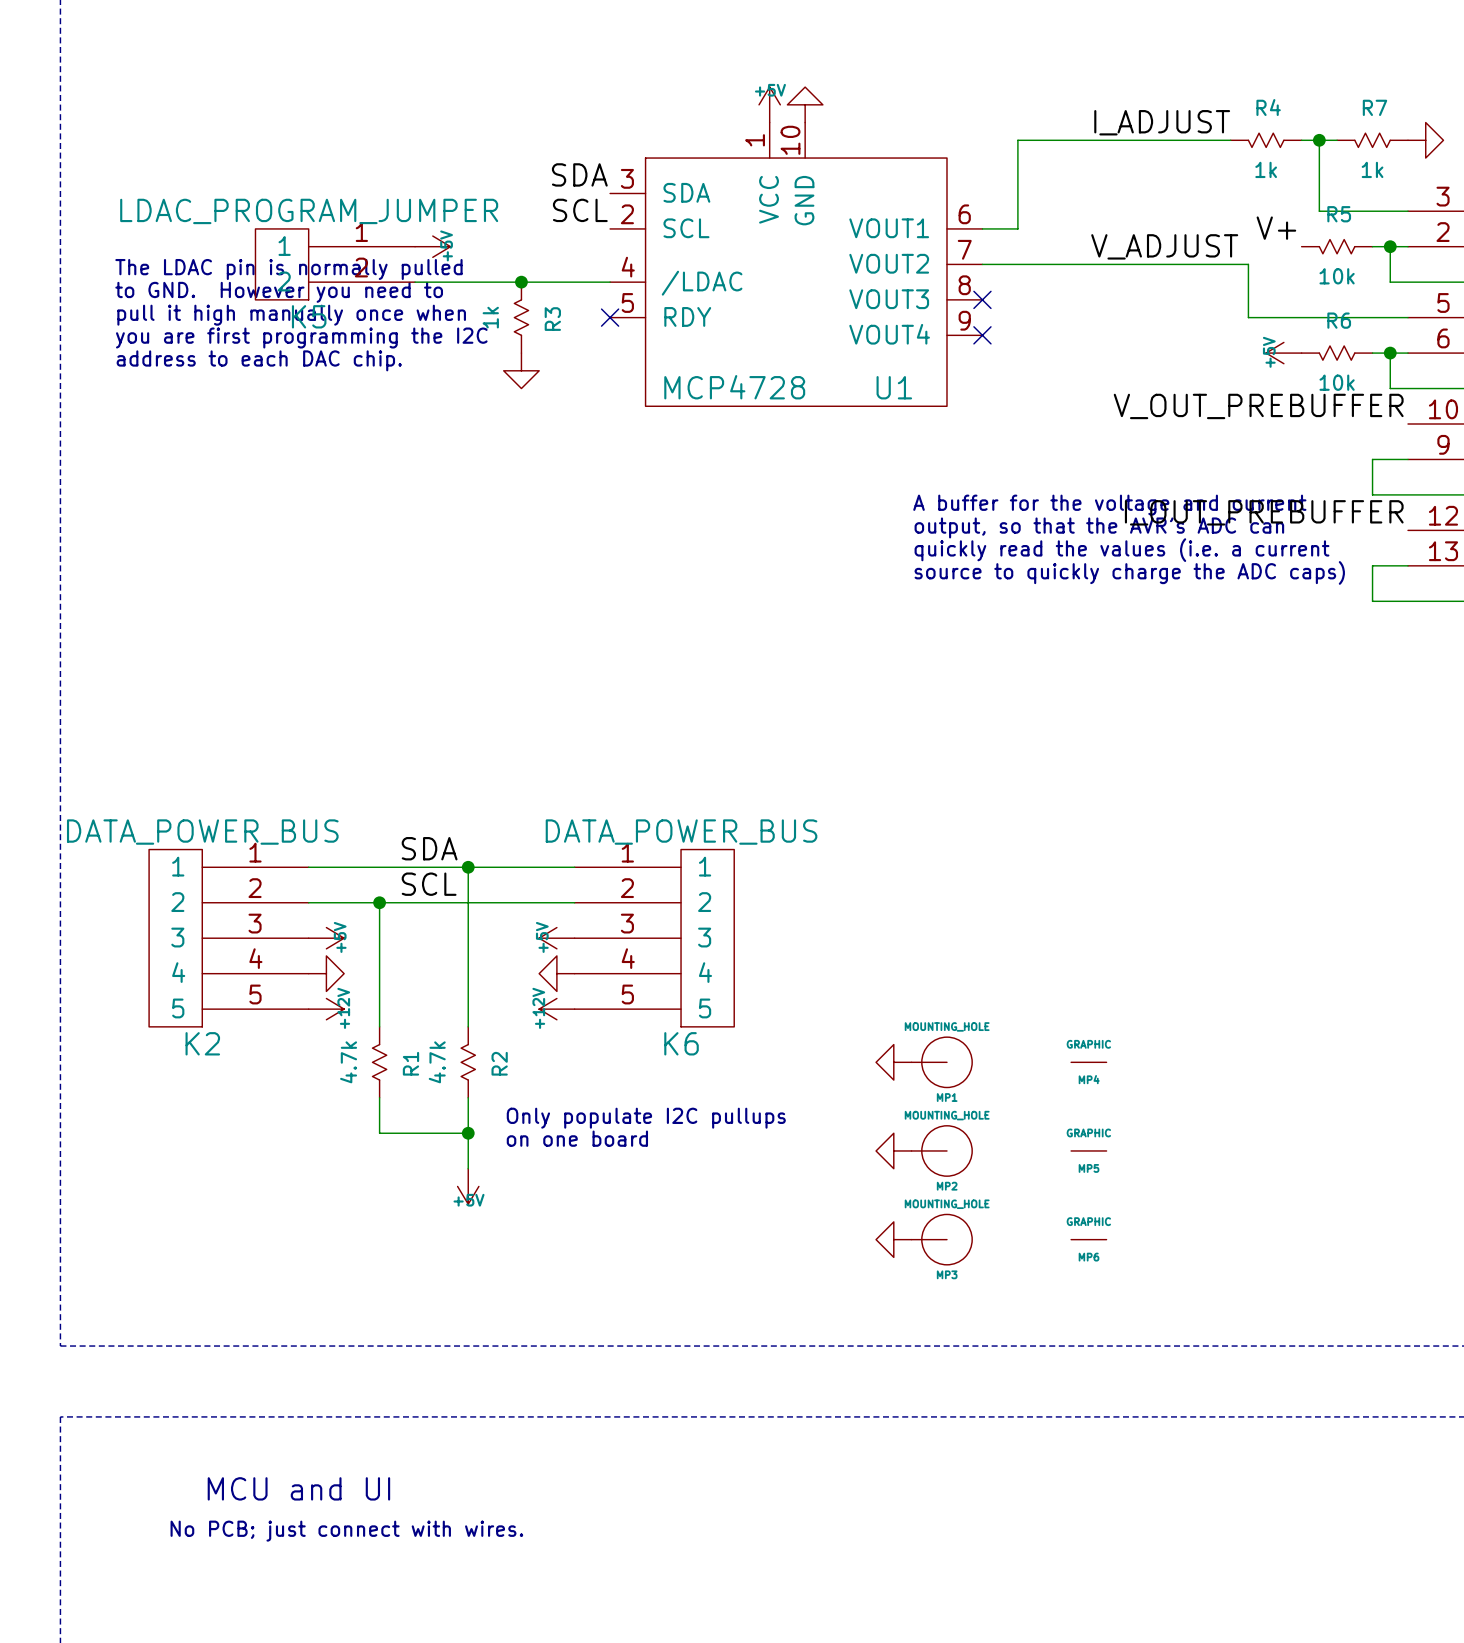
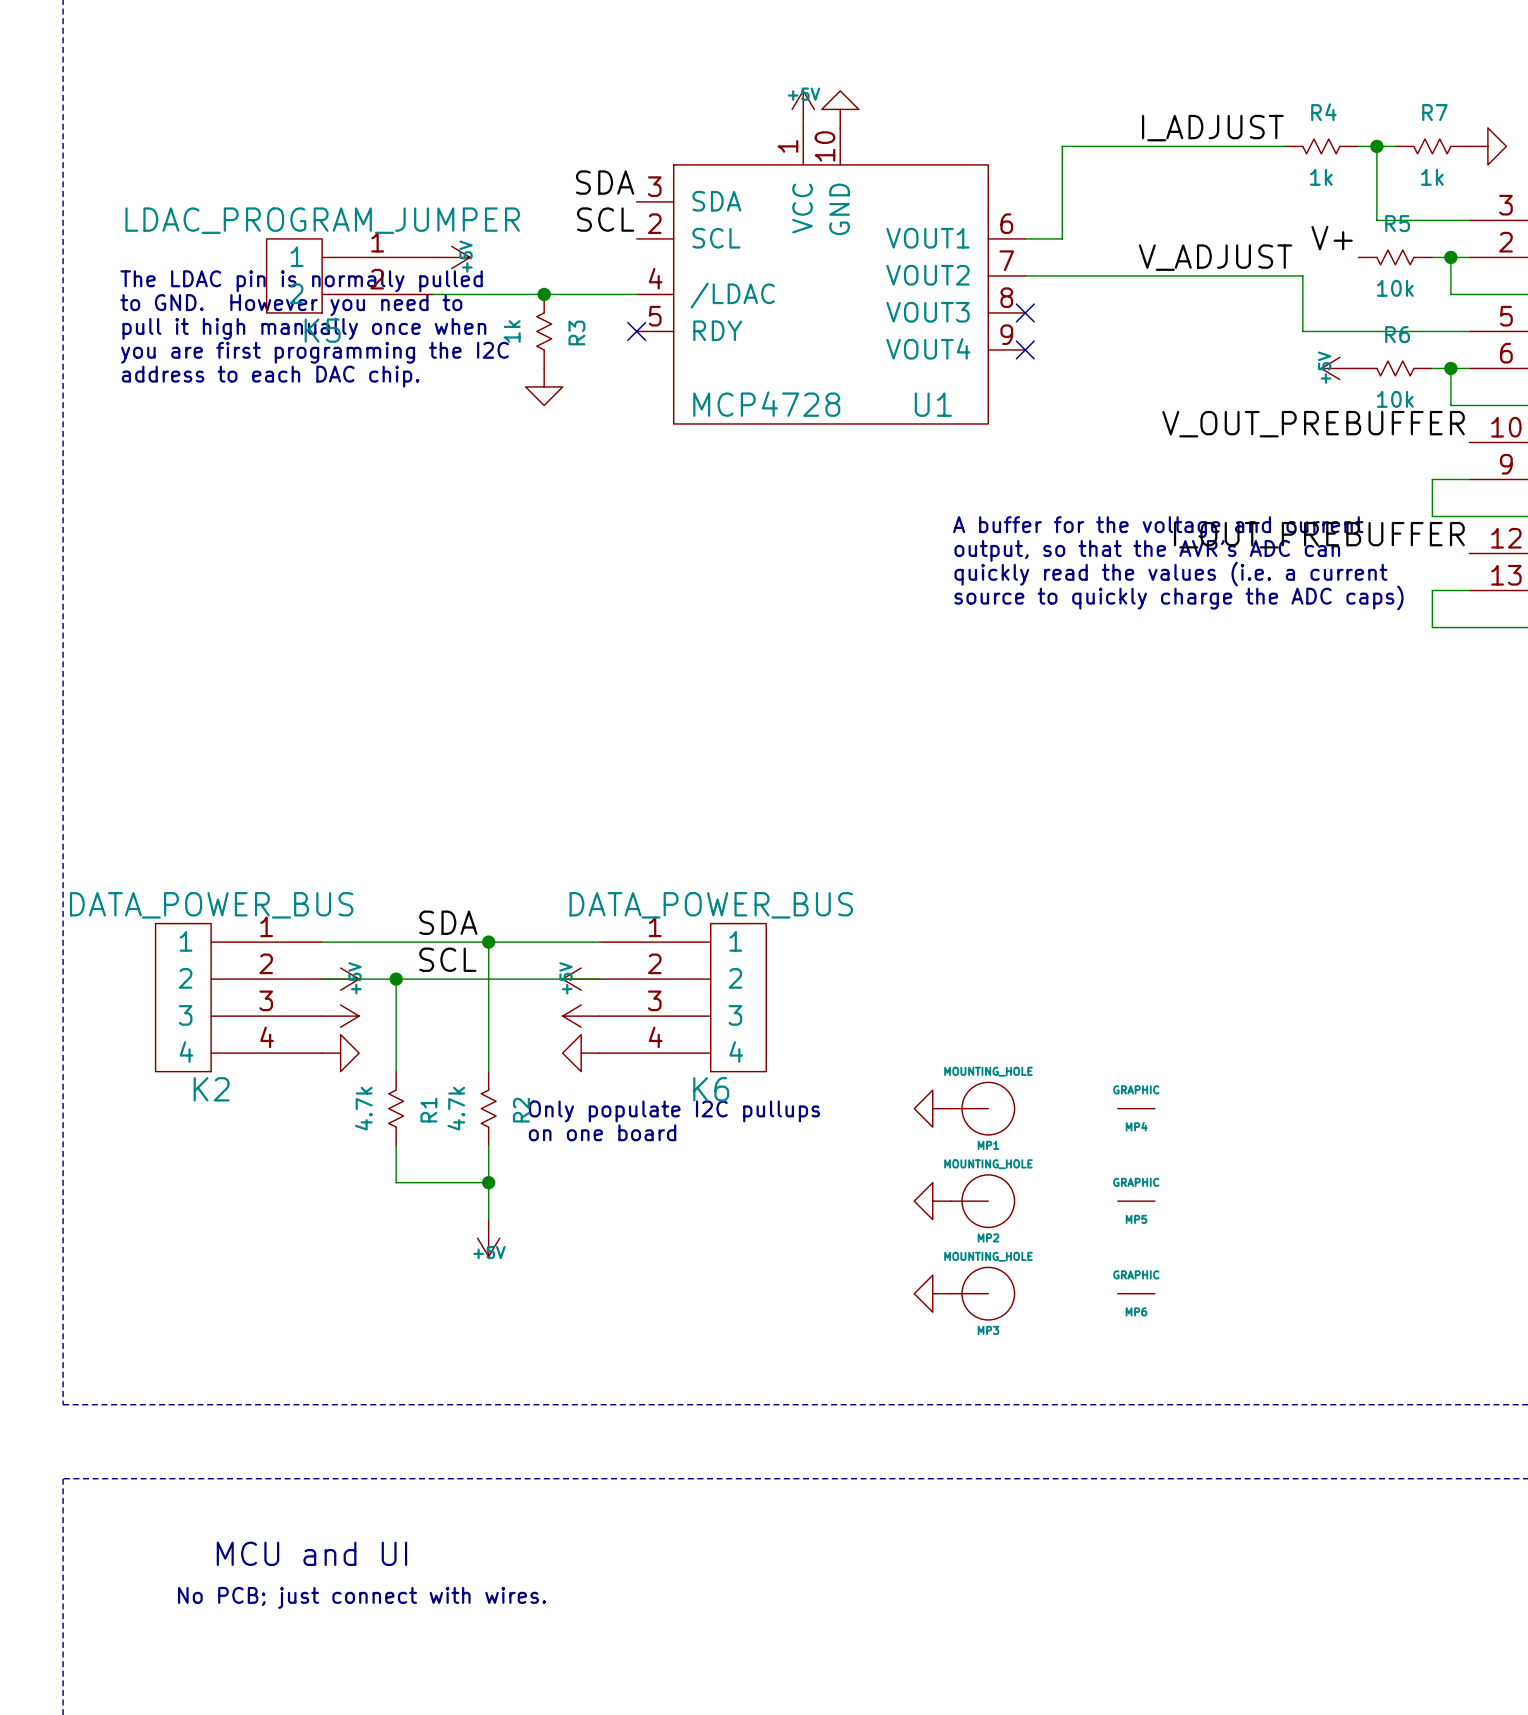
label: SDA (429, 848) -> none
K2 symbol: [149, 849, 309, 1027] -> [155, 923, 323, 1072]
K6 symbol: [574, 849, 735, 1027] -> [599, 923, 767, 1072]
wire: (308, 867) (574, 867) -> (322, 979) (599, 979)
wire: (468, 867) (468, 902) -> none
junction position: (468, 867) -> (488, 942)
label: SCL (429, 884) -> SDA (448, 922)
wire: (379, 902) (379, 938) -> none
junction position: (379, 902) -> (396, 979)
label: none -> SCL (447, 959)
power symbol shape: [308, 955, 345, 992] -> [322, 1005, 360, 1028]
power symbol shape: [539, 955, 575, 992] -> [562, 1005, 600, 1028]
power symbol shape: [308, 998, 345, 1020] -> [322, 1034, 360, 1072]
power symbol shape: [539, 998, 575, 1020] -> [562, 1034, 600, 1072]
power symbol text: +12V (343, 1008) -> none
power symbol text: +12V (538, 1008) -> none
text position: Only populate I2C pullups (646, 1118) -> Only populate I2C pullups (674, 1111)
text position: on one board (577, 1138) -> on one board (602, 1132)

